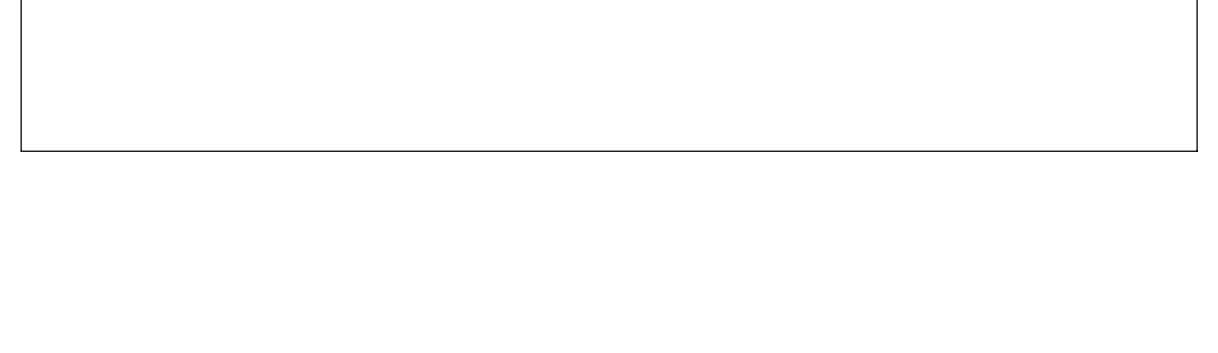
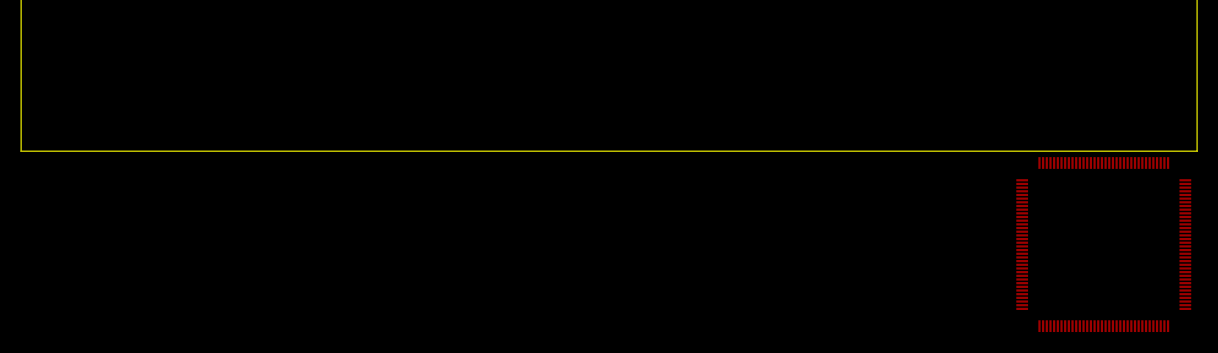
part: none -> (1103, 244)

